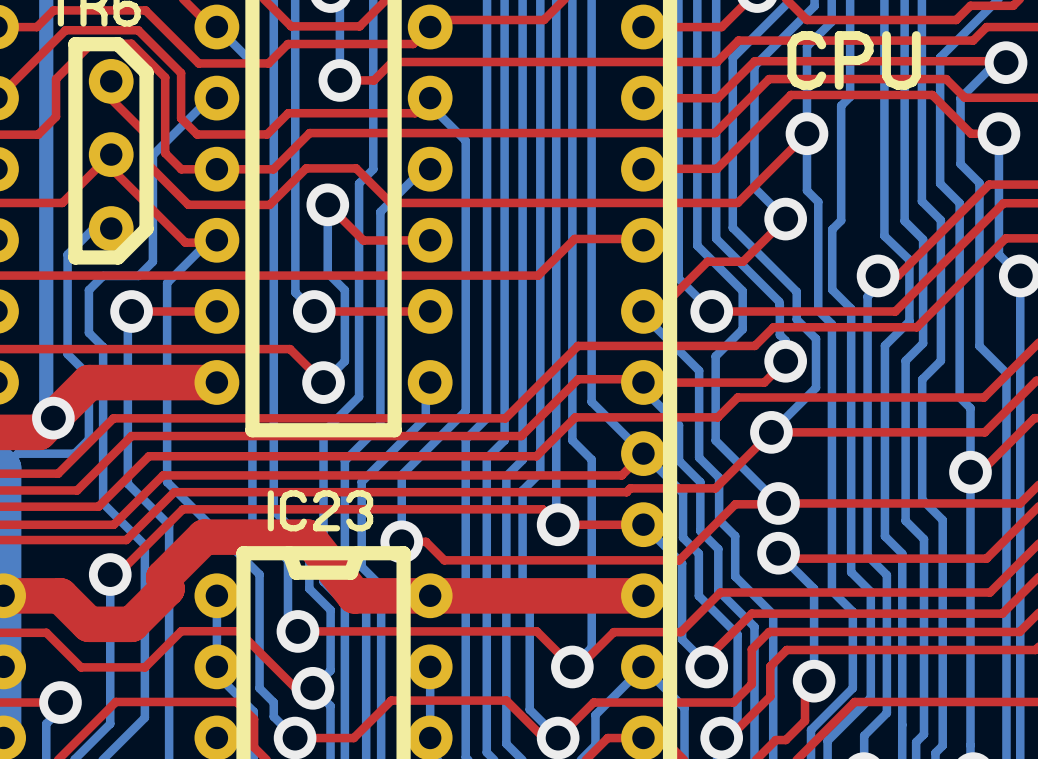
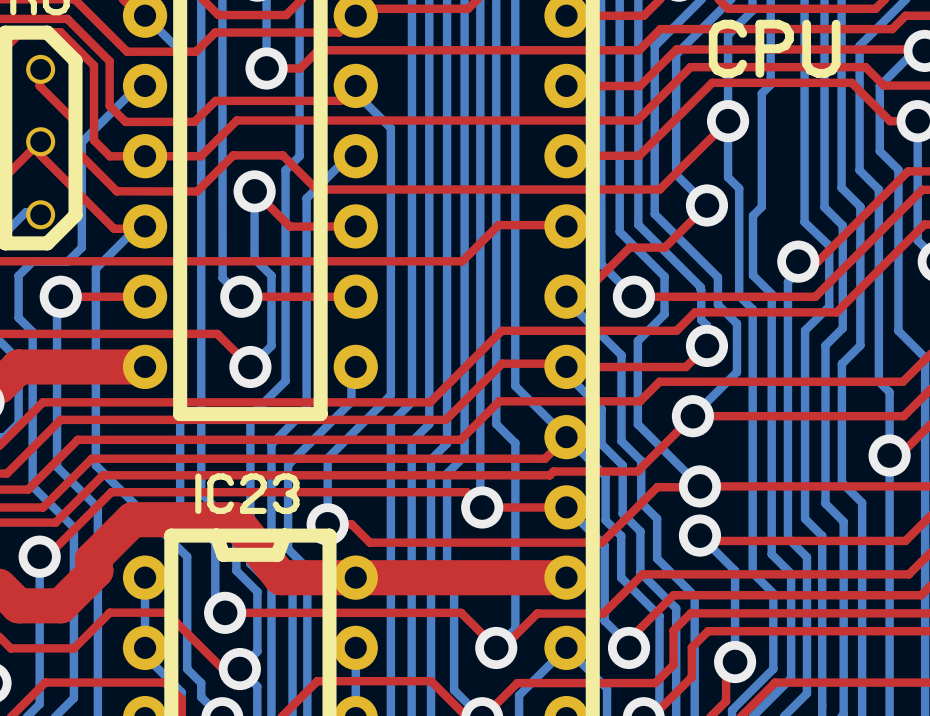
part footprint: [88, 58, 134, 251] -> [26, 54, 56, 230]

